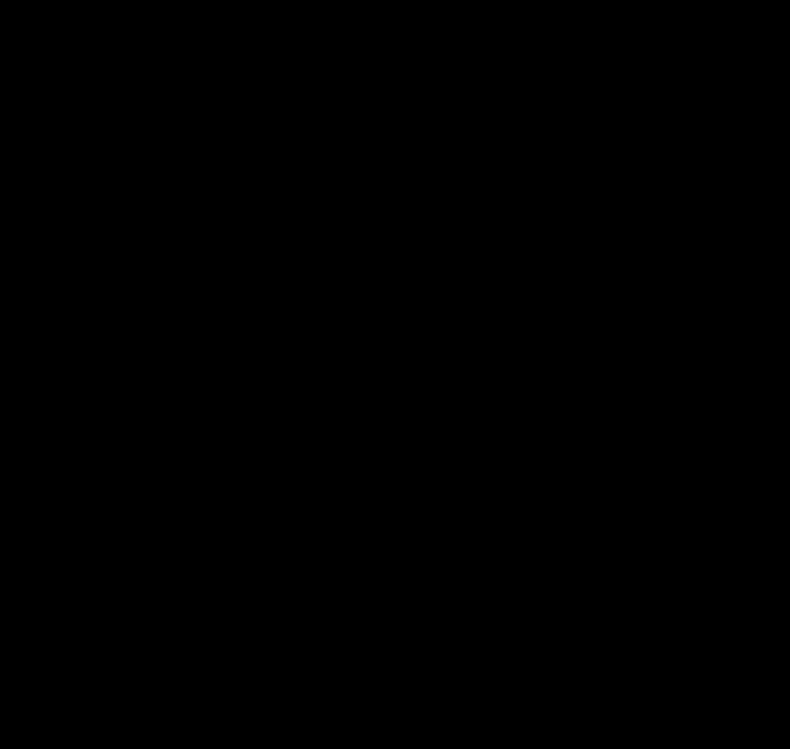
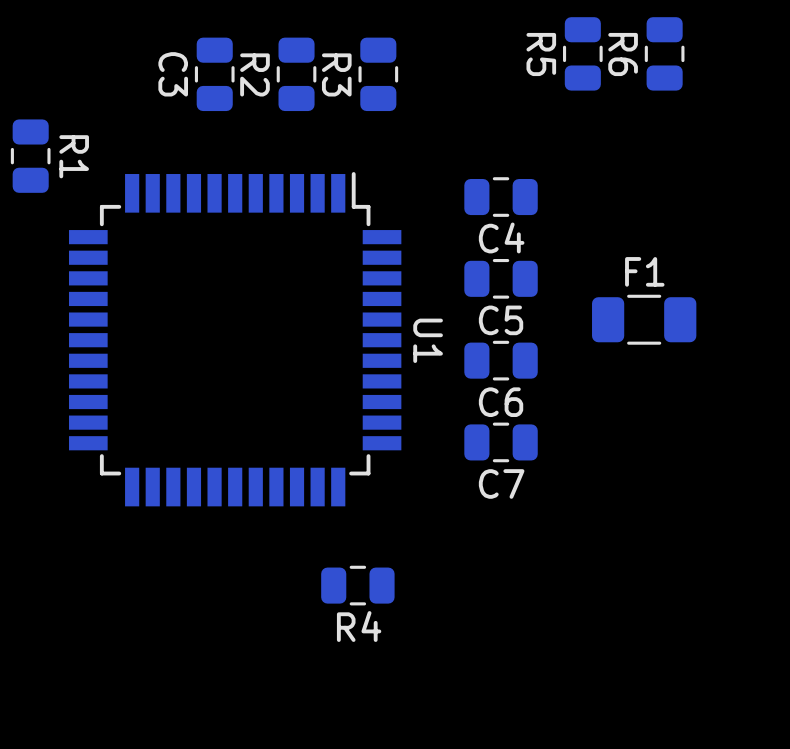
R5: none -> (582, 53)
R6: none -> (664, 53)
C3: none -> (214, 74)
R2: none -> (296, 74)
R3: none -> (378, 74)
R1: none -> (30, 156)
C4: none -> (501, 197)
C5: none -> (501, 278)
F1: none -> (644, 319)
U1: none -> (235, 339)
C6: none -> (501, 360)
C7: none -> (501, 442)
R4: none -> (357, 585)

